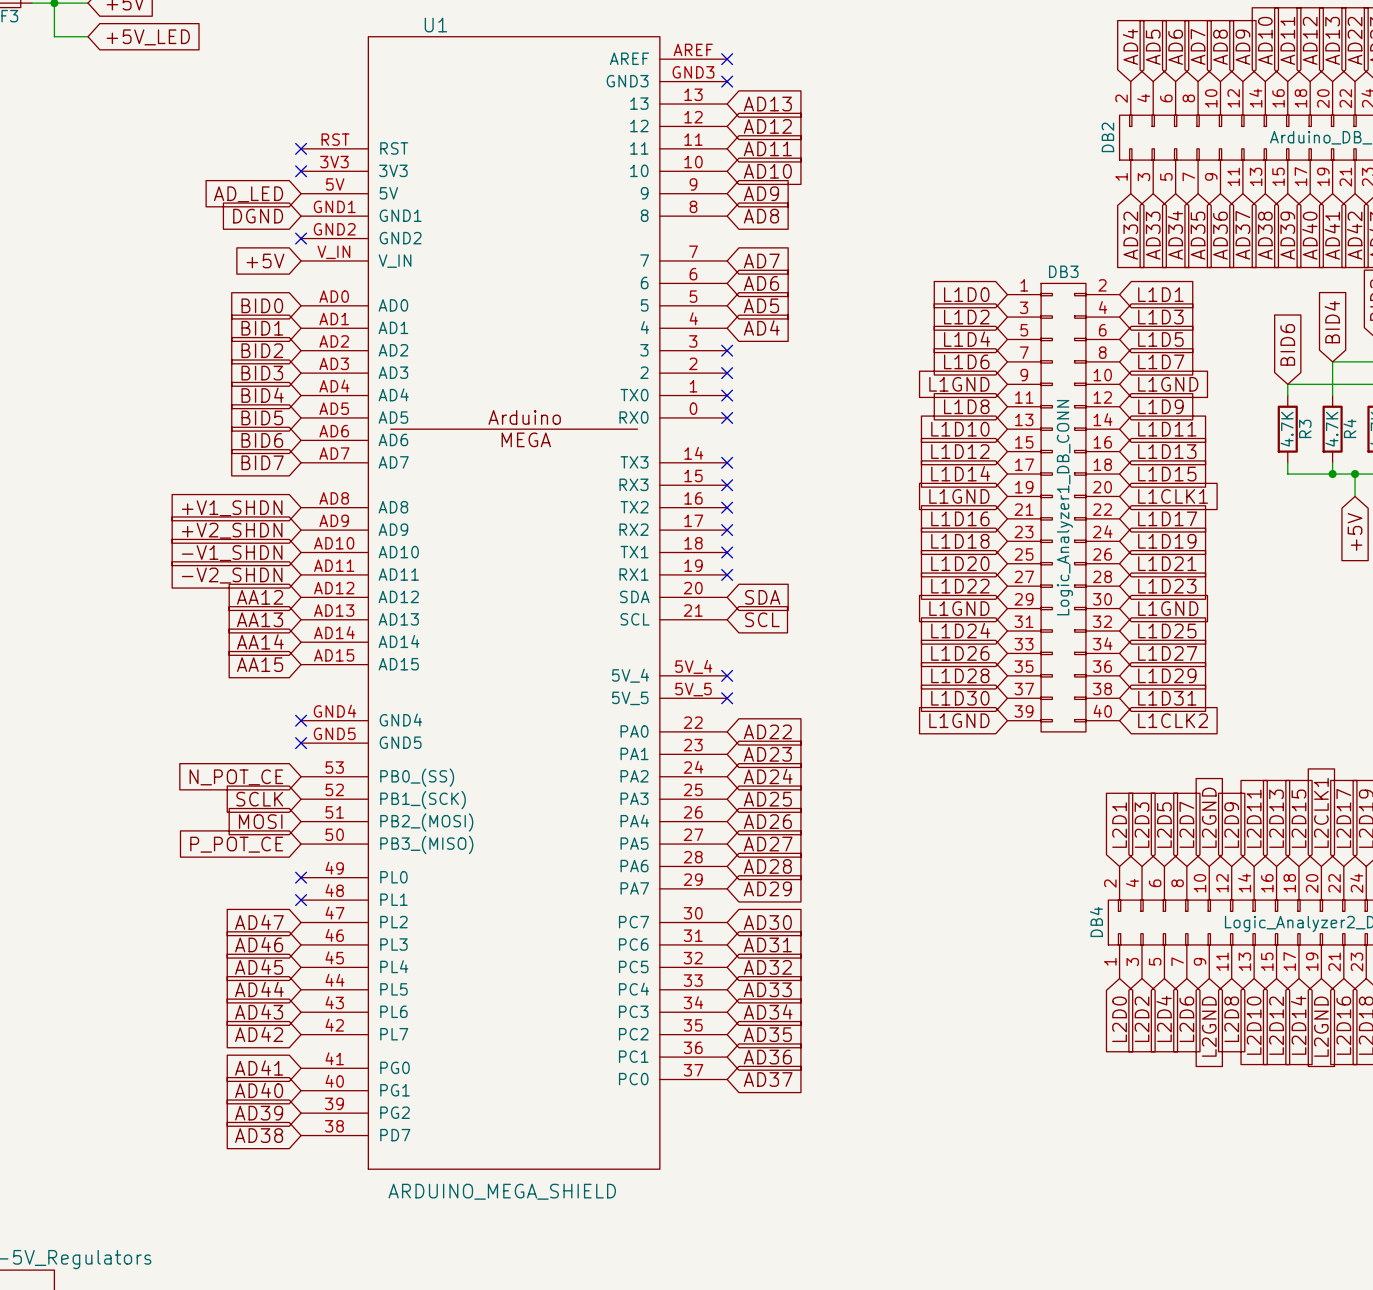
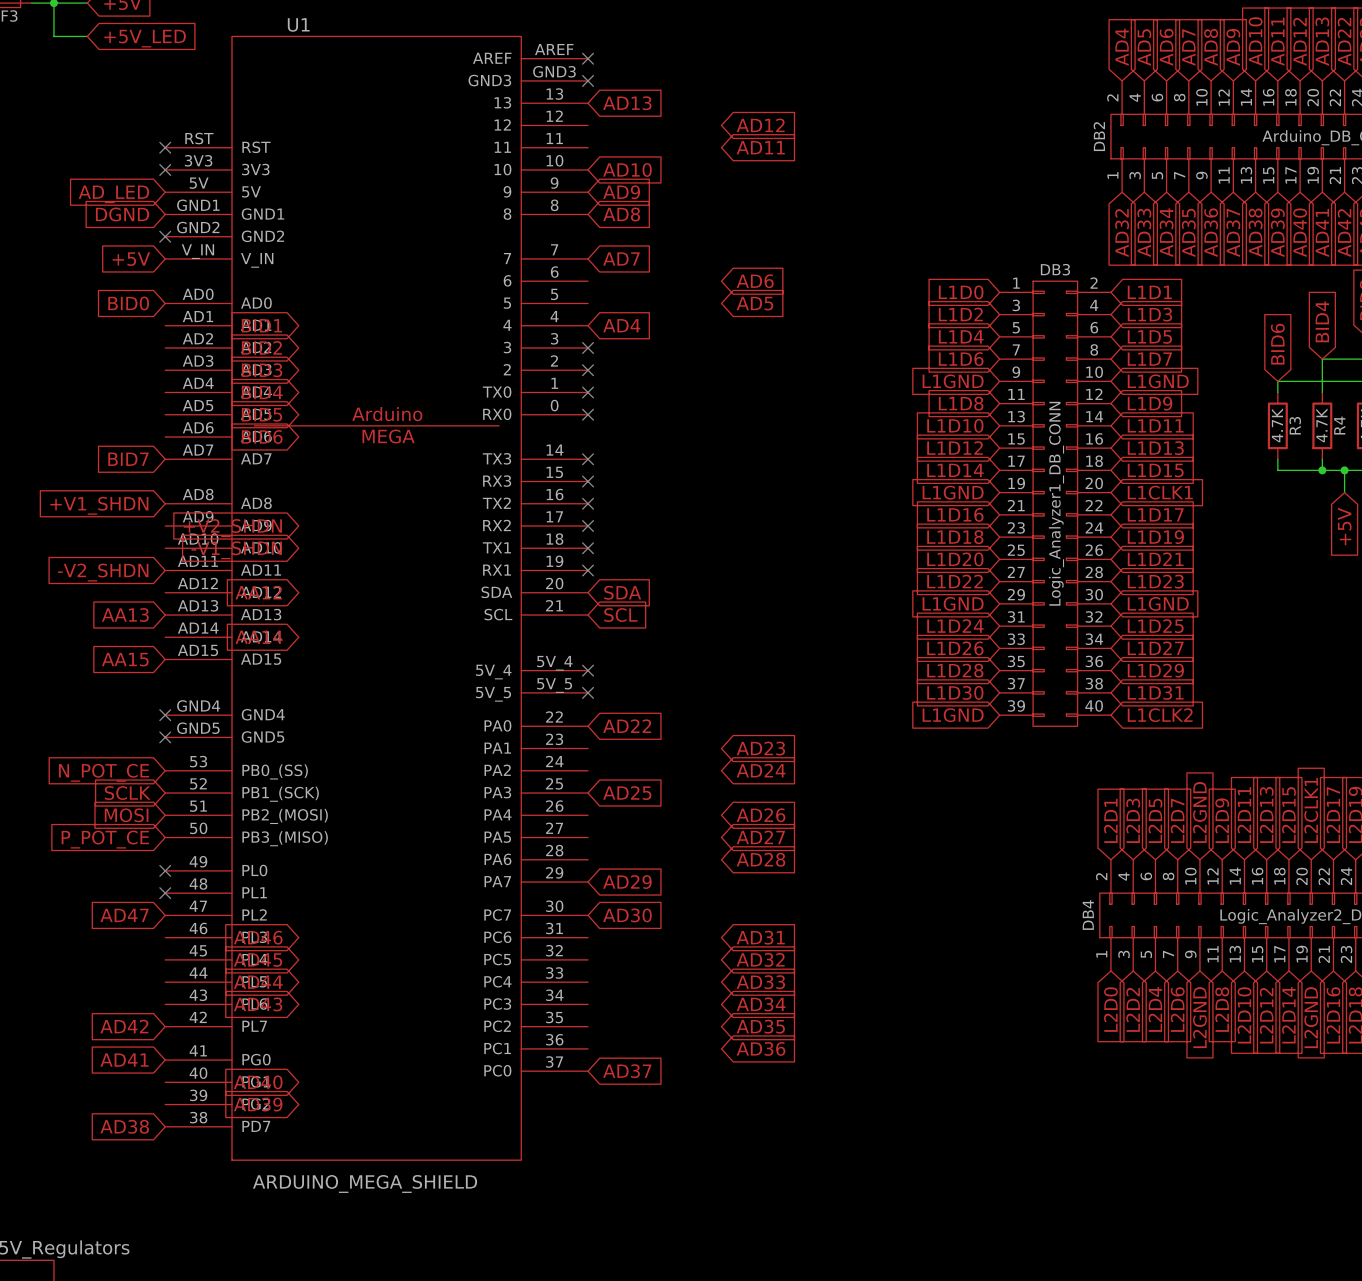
no-connect mark: none -> (588, 58)
no-connect mark: (727, 59) -> none
no-connect mark: none -> (588, 80)
no-connect mark: (727, 81) -> none
global label position: AD13 (767, 104) -> AD13 (627, 103)
no-connect mark: none -> (165, 147)
no-connect mark: (301, 148) -> none
no-connect mark: none -> (165, 169)
no-connect mark: (301, 171) -> none
global label position: AD10 (767, 171) -> AD10 (627, 169)
global label position: AD9 (761, 193) -> AD9 (621, 192)
global label position: AD_LED (248, 194) -> AD_LED (113, 194)
global label position: DGND (258, 216) -> DGND (122, 214)
global label position: AD8 (761, 216) -> AD8 (621, 214)
no-connect mark: none -> (165, 236)
no-connect mark: (301, 238) -> none
global label position: +5V (265, 260) -> +5V (131, 259)
global label position: AD7 (761, 260) -> AD7 (621, 258)
global label position: BID0 (262, 305) -> BID0 (128, 303)
global label position: AD4 (761, 327) -> AD4 (621, 325)
no-connect mark: none -> (588, 347)
no-connect mark: (727, 350) -> none
no-connect mark: none -> (588, 370)
no-connect mark: (727, 373) -> none
no-connect mark: none -> (588, 392)
no-connect mark: (727, 395) -> none
no-connect mark: none -> (588, 414)
no-connect mark: (727, 417) -> none
global label position: BID7 (262, 462) -> BID7 (128, 459)
no-connect mark: none -> (588, 459)
no-connect mark: (727, 462) -> none
no-connect mark: none -> (588, 481)
no-connect mark: (727, 485) -> none
no-connect mark: none -> (588, 503)
no-connect mark: (727, 507) -> none
global label position: +V1_SHDN (232, 508) -> +V1_SHDN (99, 505)
no-connect mark: none -> (588, 526)
no-connect mark: (727, 530) -> none
no-connect mark: none -> (588, 548)
no-connect mark: (727, 552) -> none
no-connect mark: none -> (588, 570)
no-connect mark: (727, 574) -> none
global label position: -V2_SHDN (232, 575) -> -V2_SHDN (103, 572)
global label position: SDA (762, 597) -> SDA (622, 592)
U1 position: (514, 602) -> (376, 598)
global label position: AA13 (260, 619) -> AA13 (125, 615)
global label position: SCL (762, 619) -> SCL (620, 615)
global label position: AA15 (260, 664) -> AA15 (125, 659)
no-connect mark: none -> (588, 670)
no-connect mark: (727, 675) -> none
no-connect mark: none -> (588, 692)
no-connect mark: (727, 698) -> none
no-connect mark: none -> (165, 715)
no-connect mark: (301, 720) -> none
global label position: AD22 (767, 731) -> AD22 (627, 726)
no-connect mark: none -> (165, 737)
no-connect mark: (301, 743) -> none
global label position: N_POT_CE (236, 777) -> N_POT_CE (104, 772)
global label position: SCLK (259, 799) -> SCLK (127, 793)
global label position: AD25 (767, 799) -> AD25 (627, 793)
global label position: MOSI (260, 821) -> MOSI (126, 815)
global label position: P_POT_CE (236, 844) -> P_POT_CE (105, 839)
no-connect mark: none -> (165, 870)
no-connect mark: (301, 877) -> none
global label position: AD29 (767, 888) -> AD29 (627, 882)
no-connect mark: none -> (165, 893)
no-connect mark: (301, 900) -> none
global label position: AD47 (259, 922) -> AD47 (124, 915)
global label position: AD30 (767, 922) -> AD30 (627, 915)
global label position: AD42 (259, 1034) -> AD42 (124, 1026)
global label position: AD41 (259, 1067) -> AD41 (124, 1060)
global label position: AD37 (768, 1079) -> AD37 (627, 1071)
global label position: AD38 (259, 1135) -> AD38 (124, 1126)

